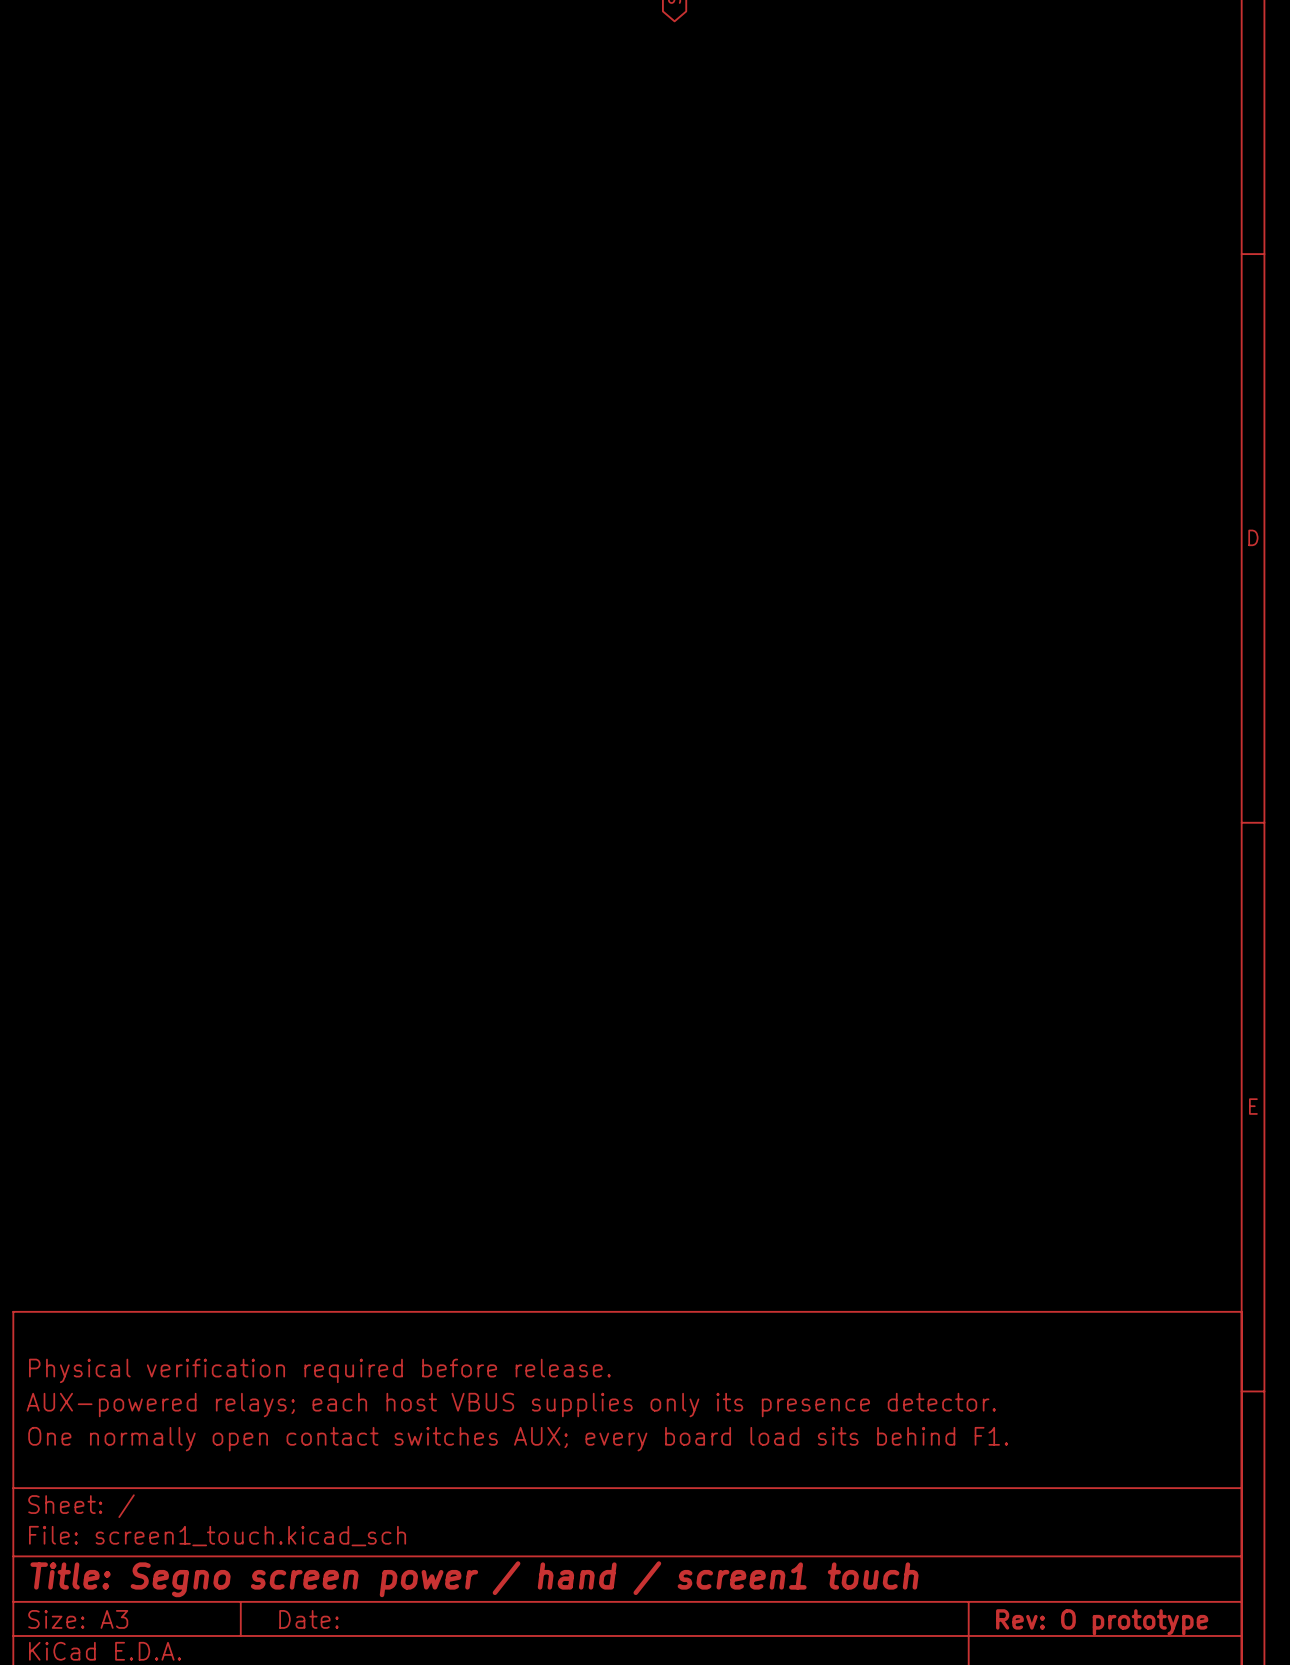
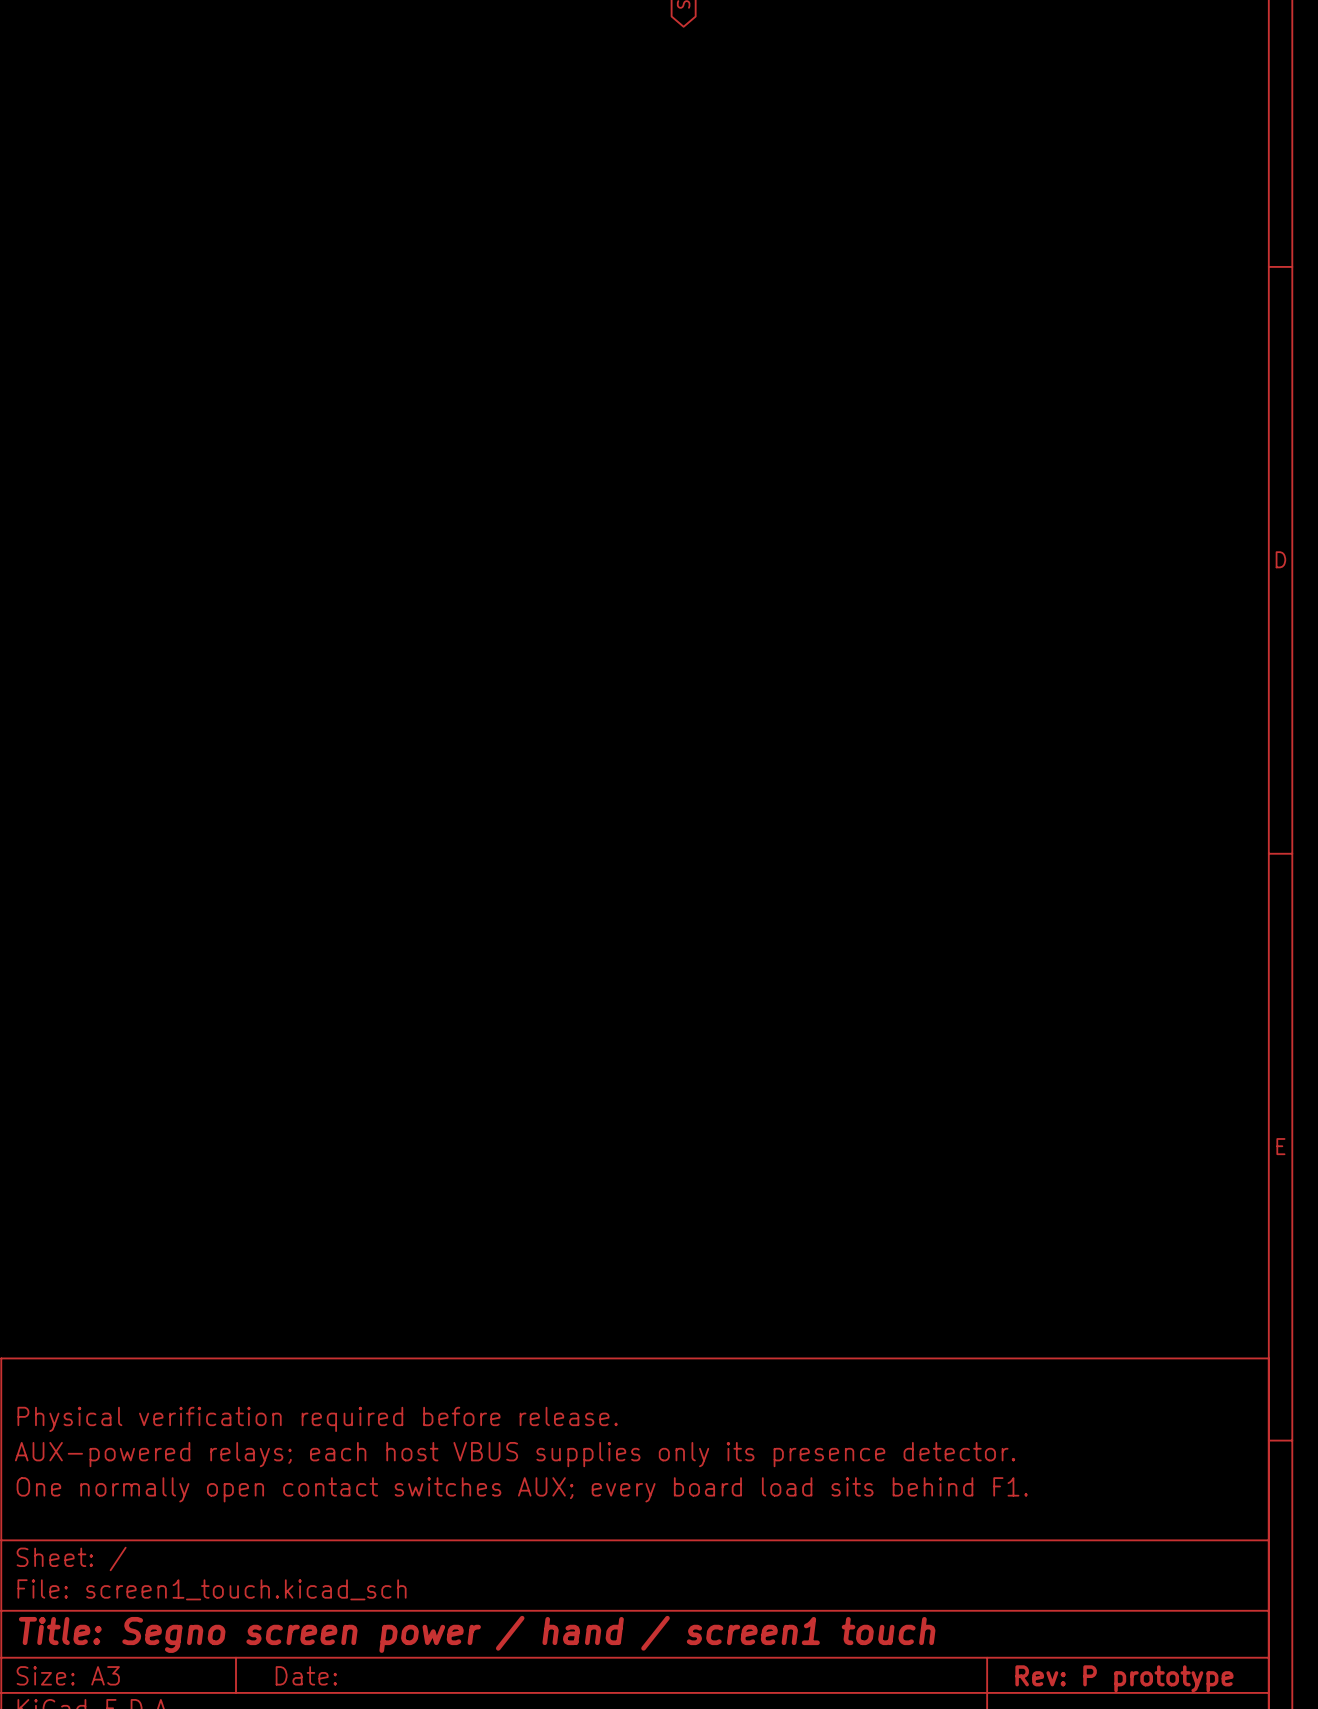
title block: Rev: O prototype (1102, 1622) -> Rev: P prototype (1124, 1678)

